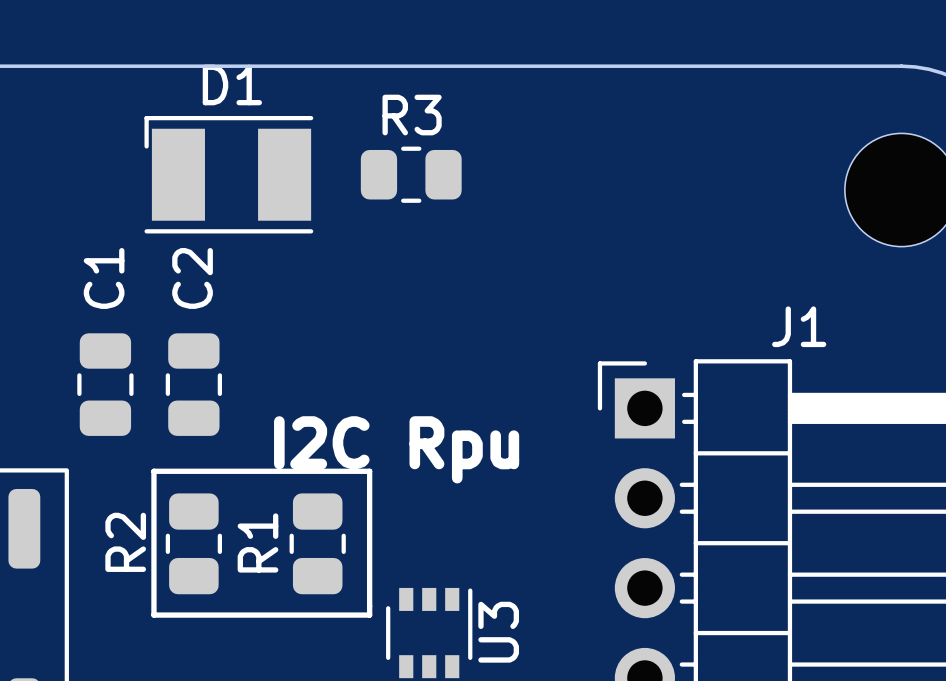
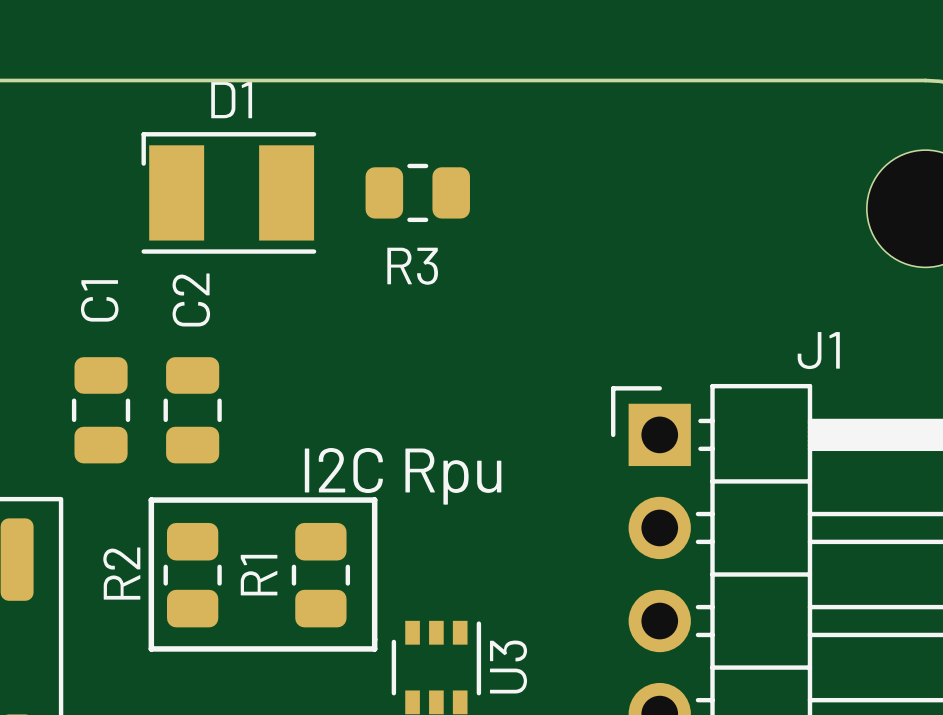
R3 name position: R3 (412, 115) -> R3 (412, 266)

